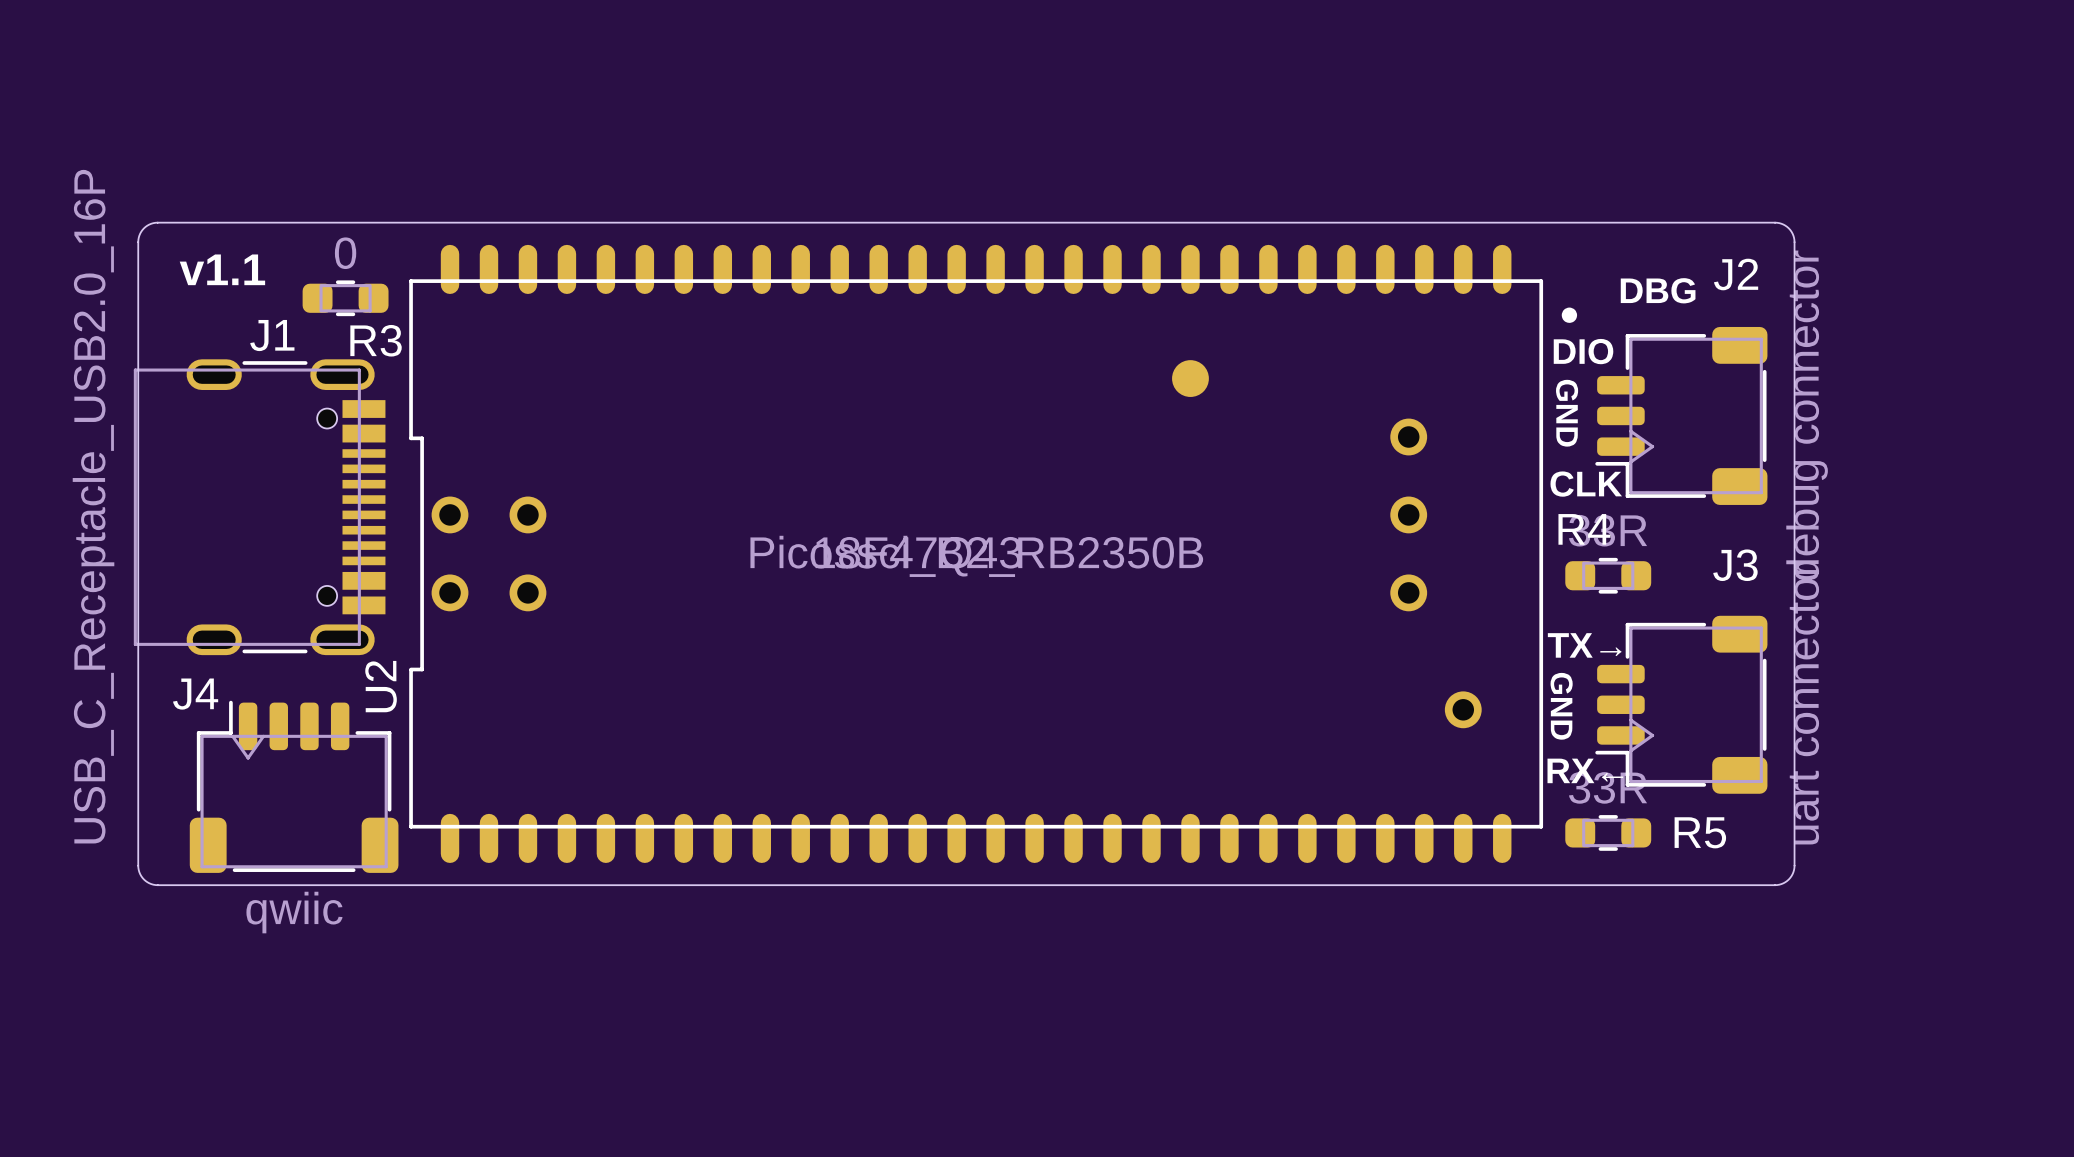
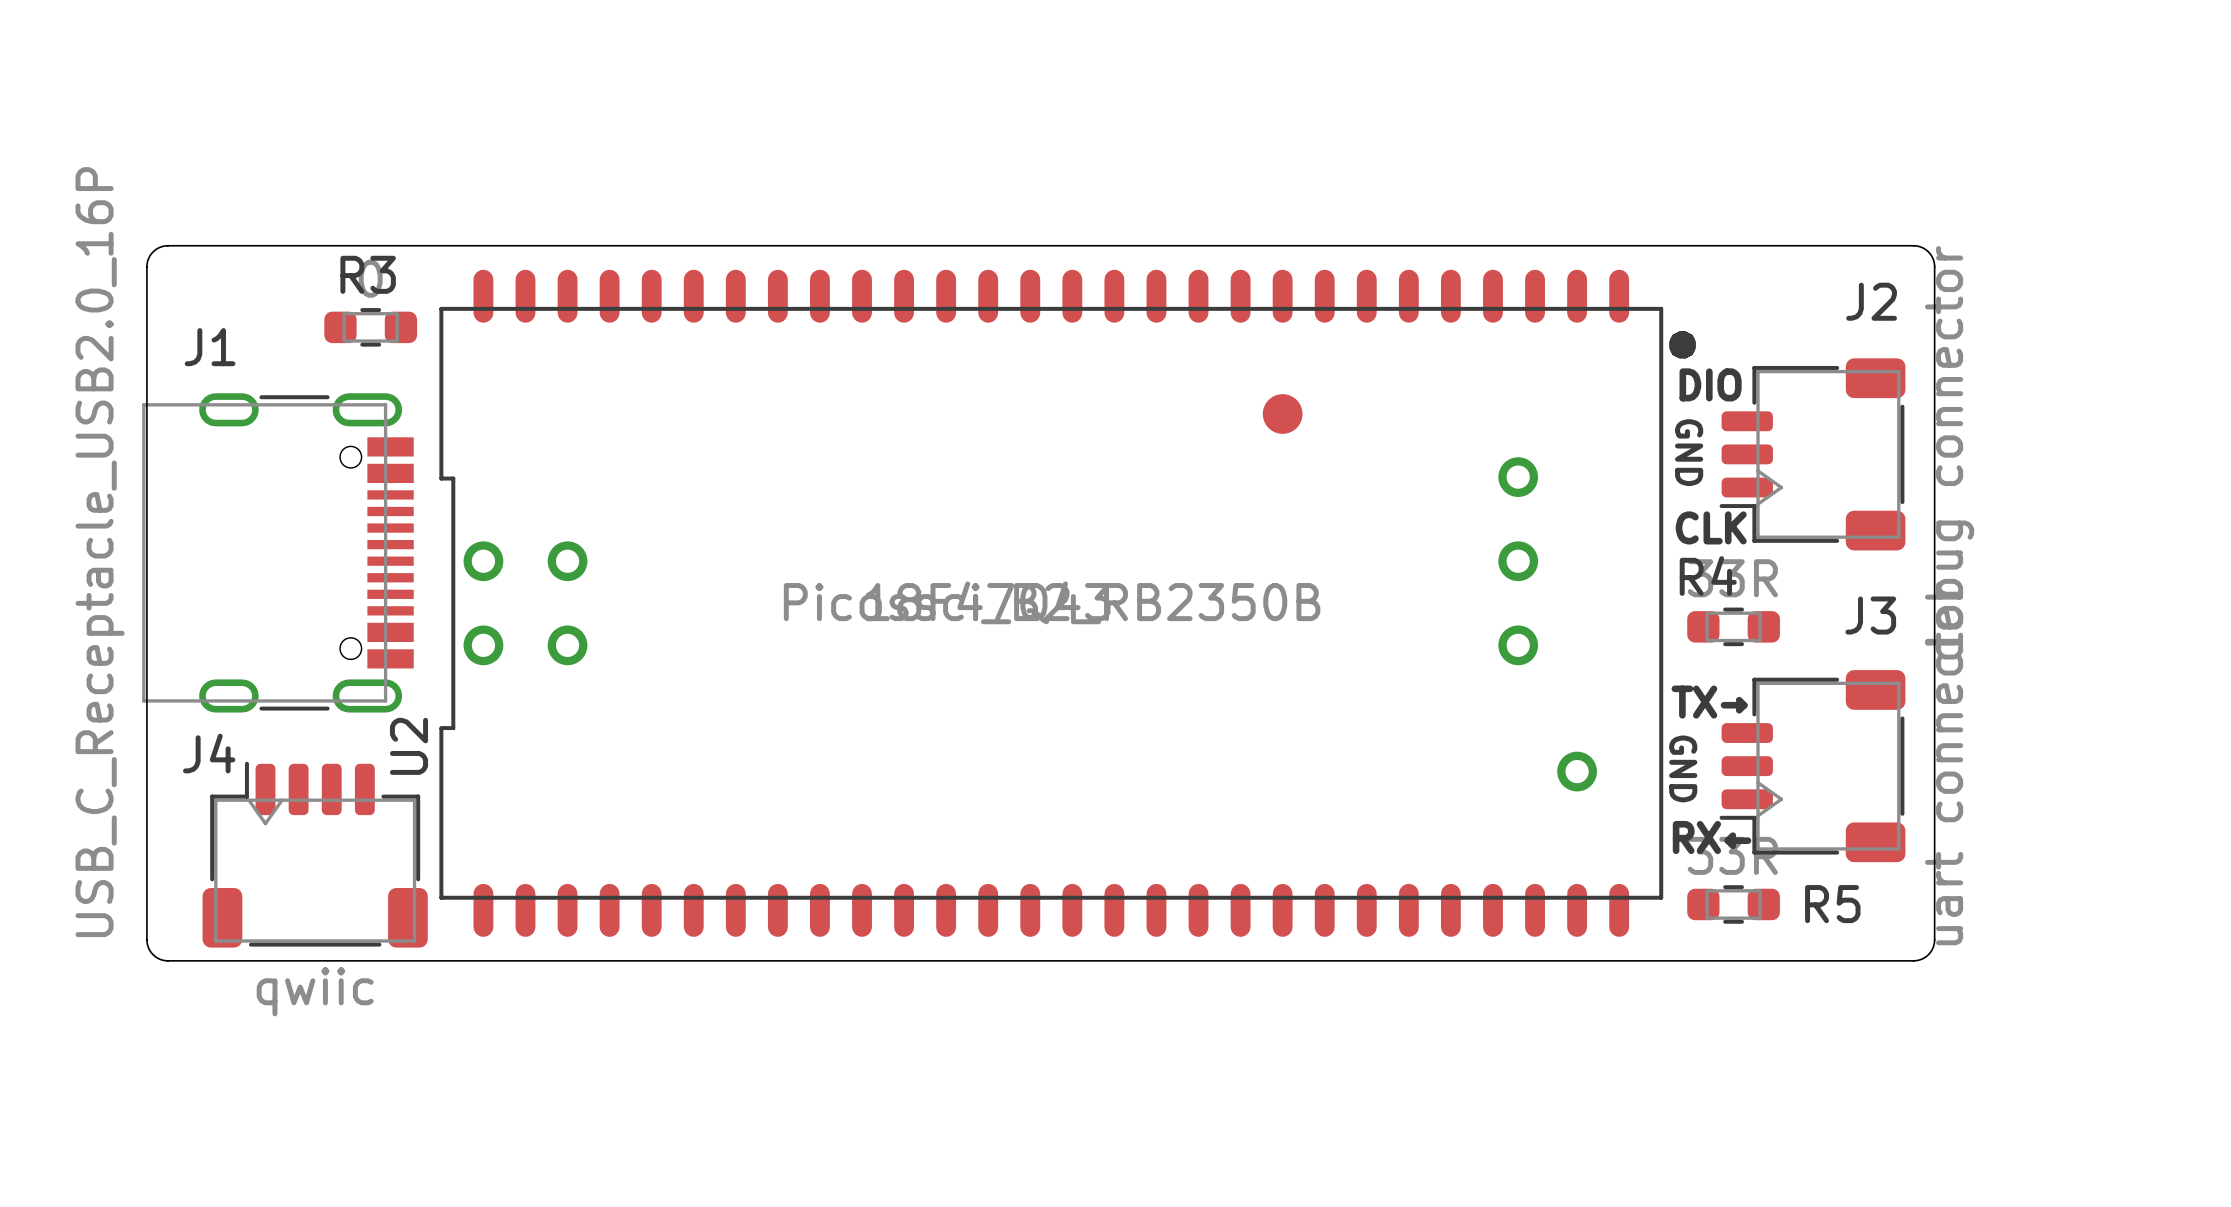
text: v1.1 (222, 269) -> none
text: DBG (1658, 290) -> none
J1 name position: J1 (272, 335) -> J1 (210, 347)
R3 name position: R3 (376, 340) -> R3 (368, 274)

